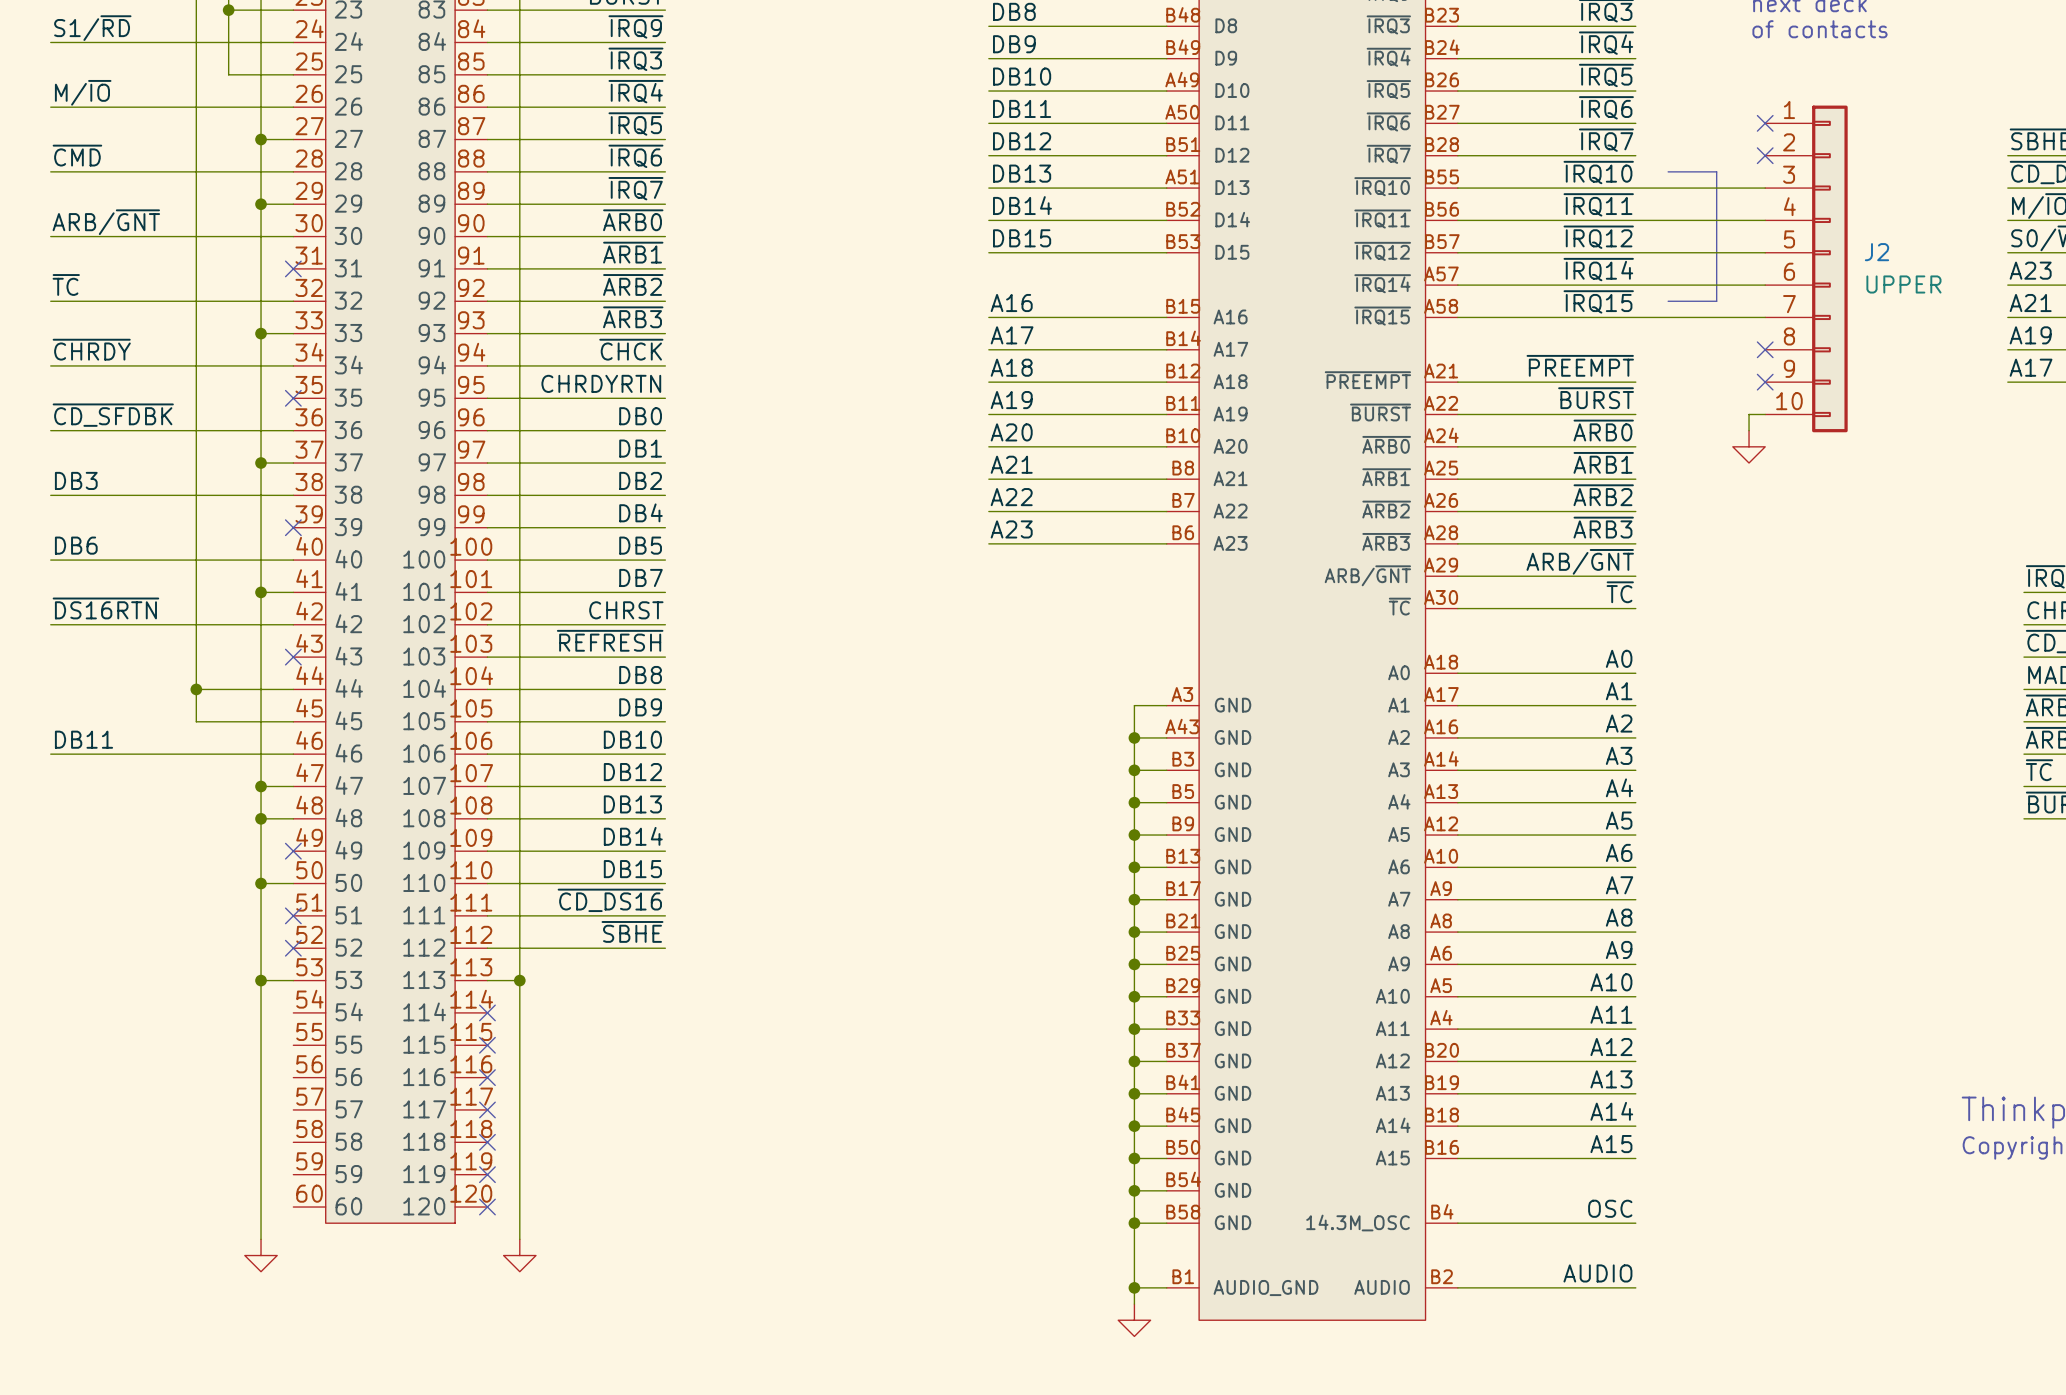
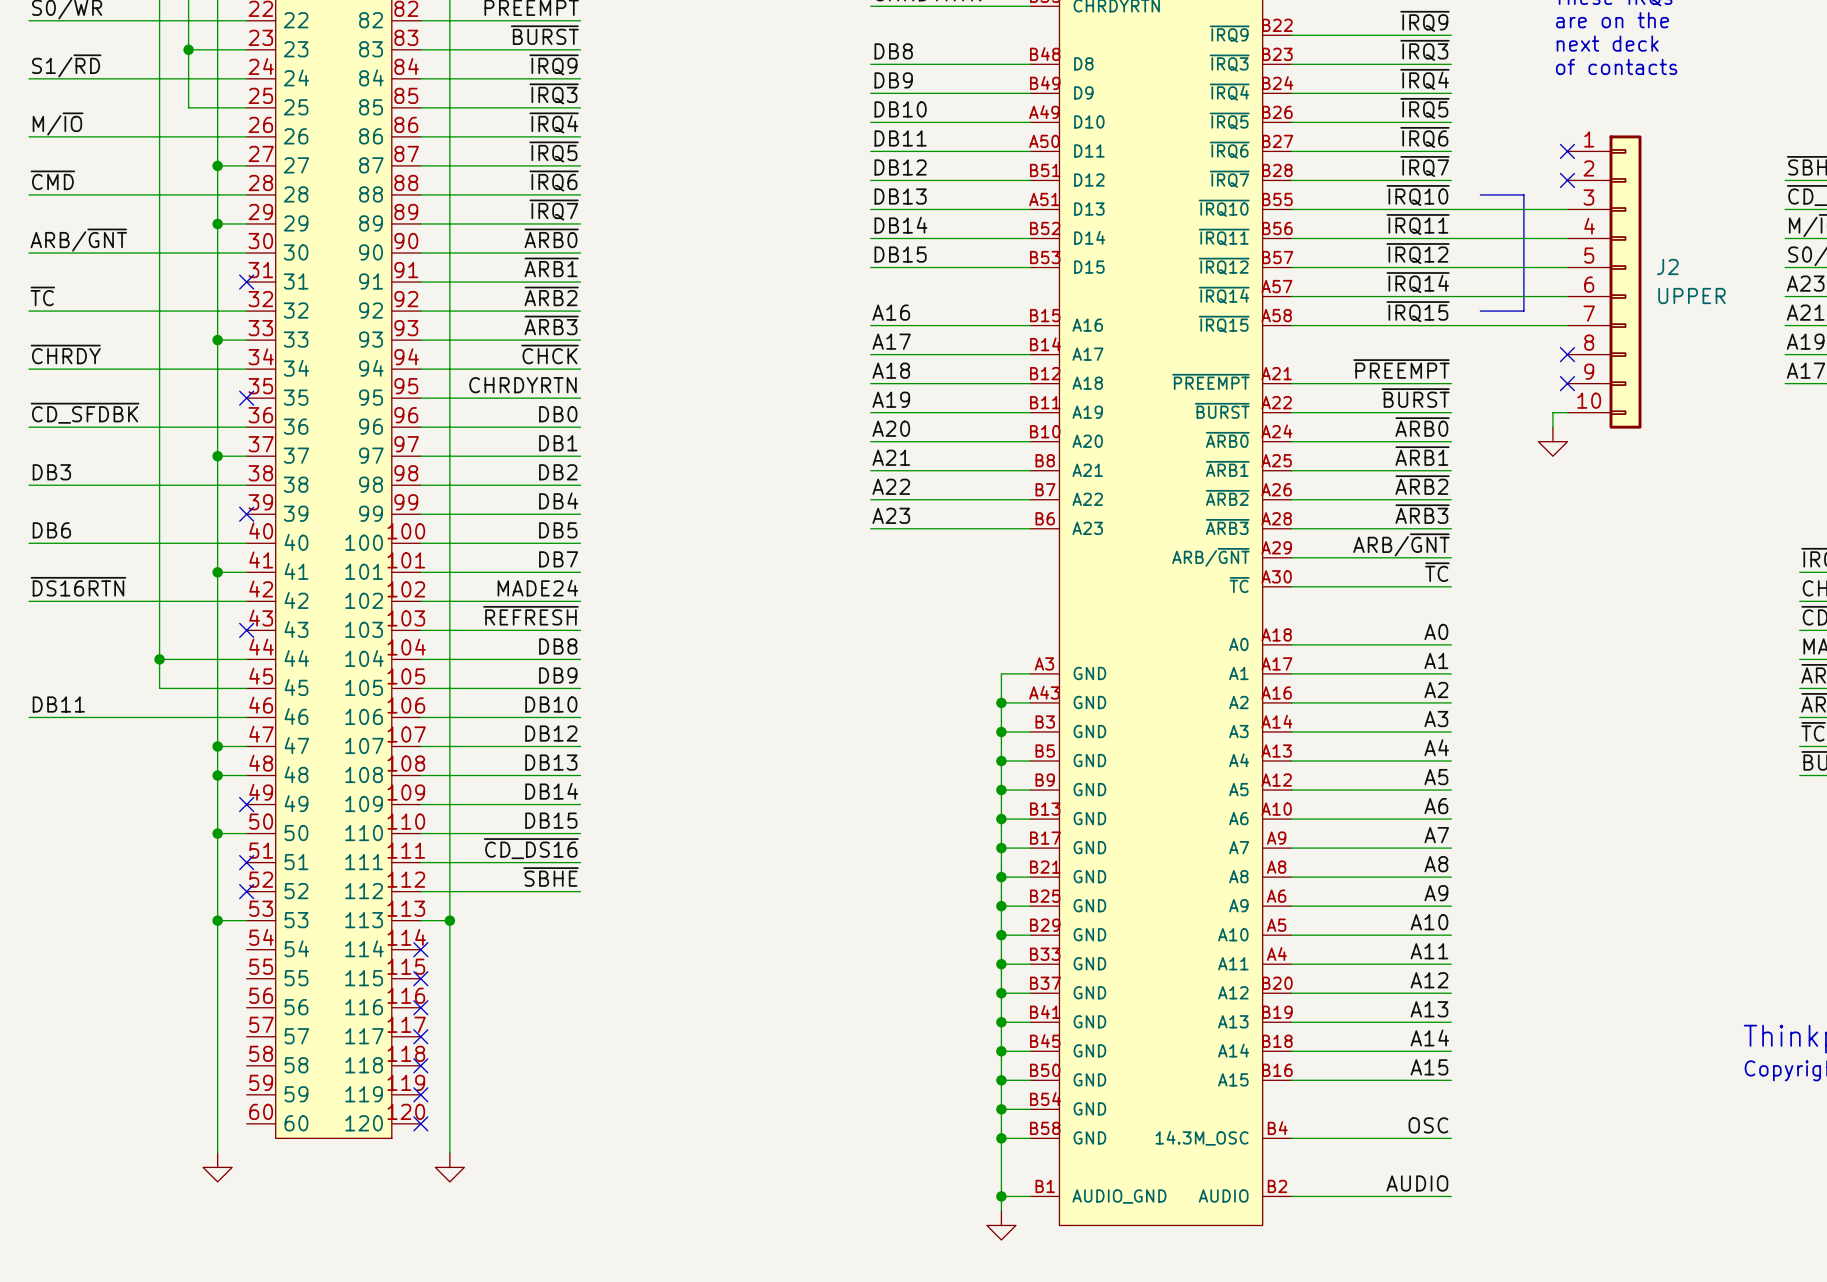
label: CHRST (626, 610) -> MADE24 (537, 588)

